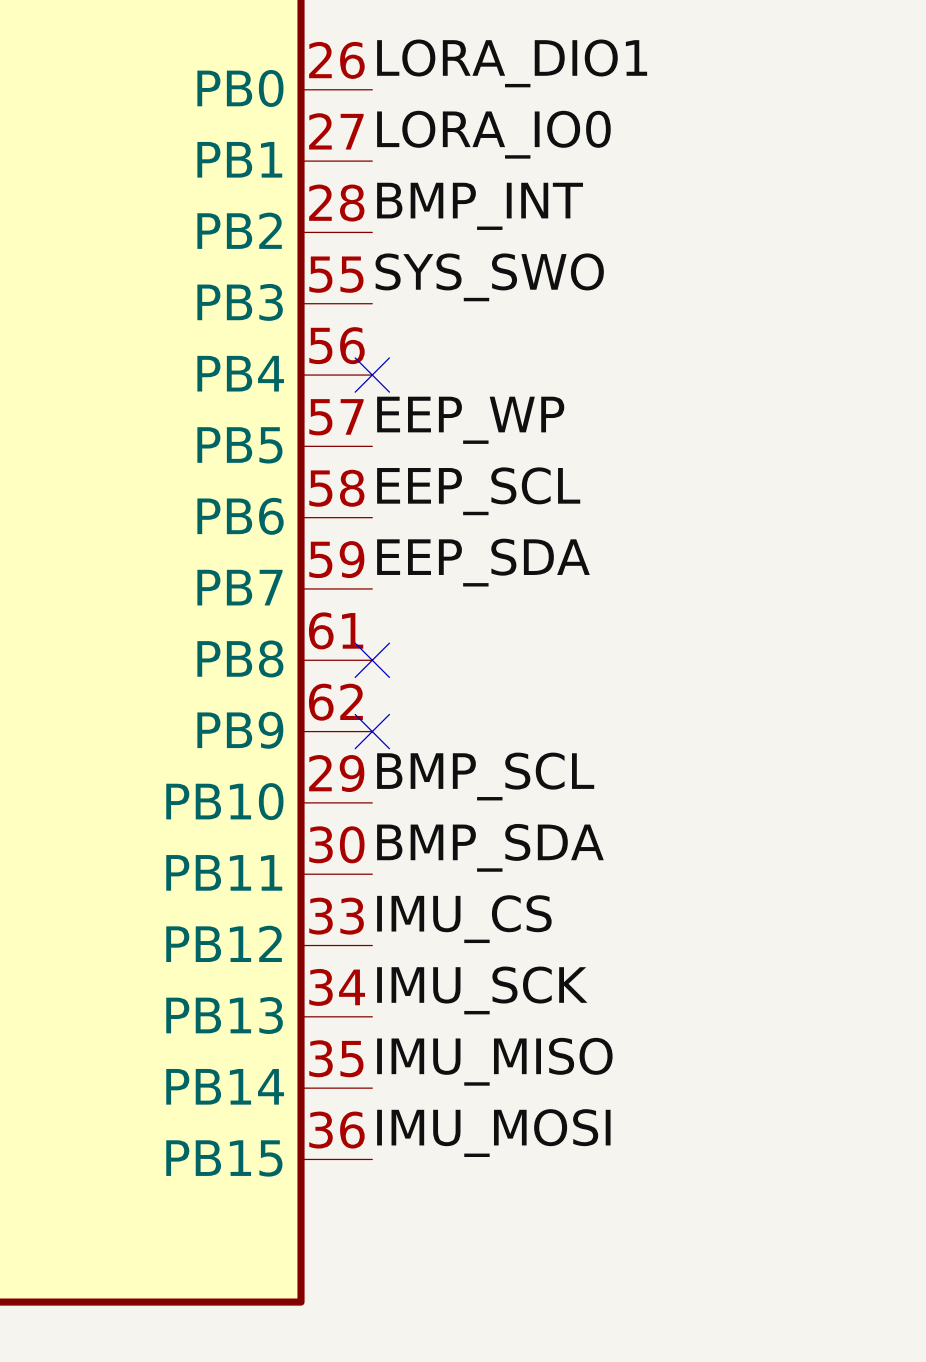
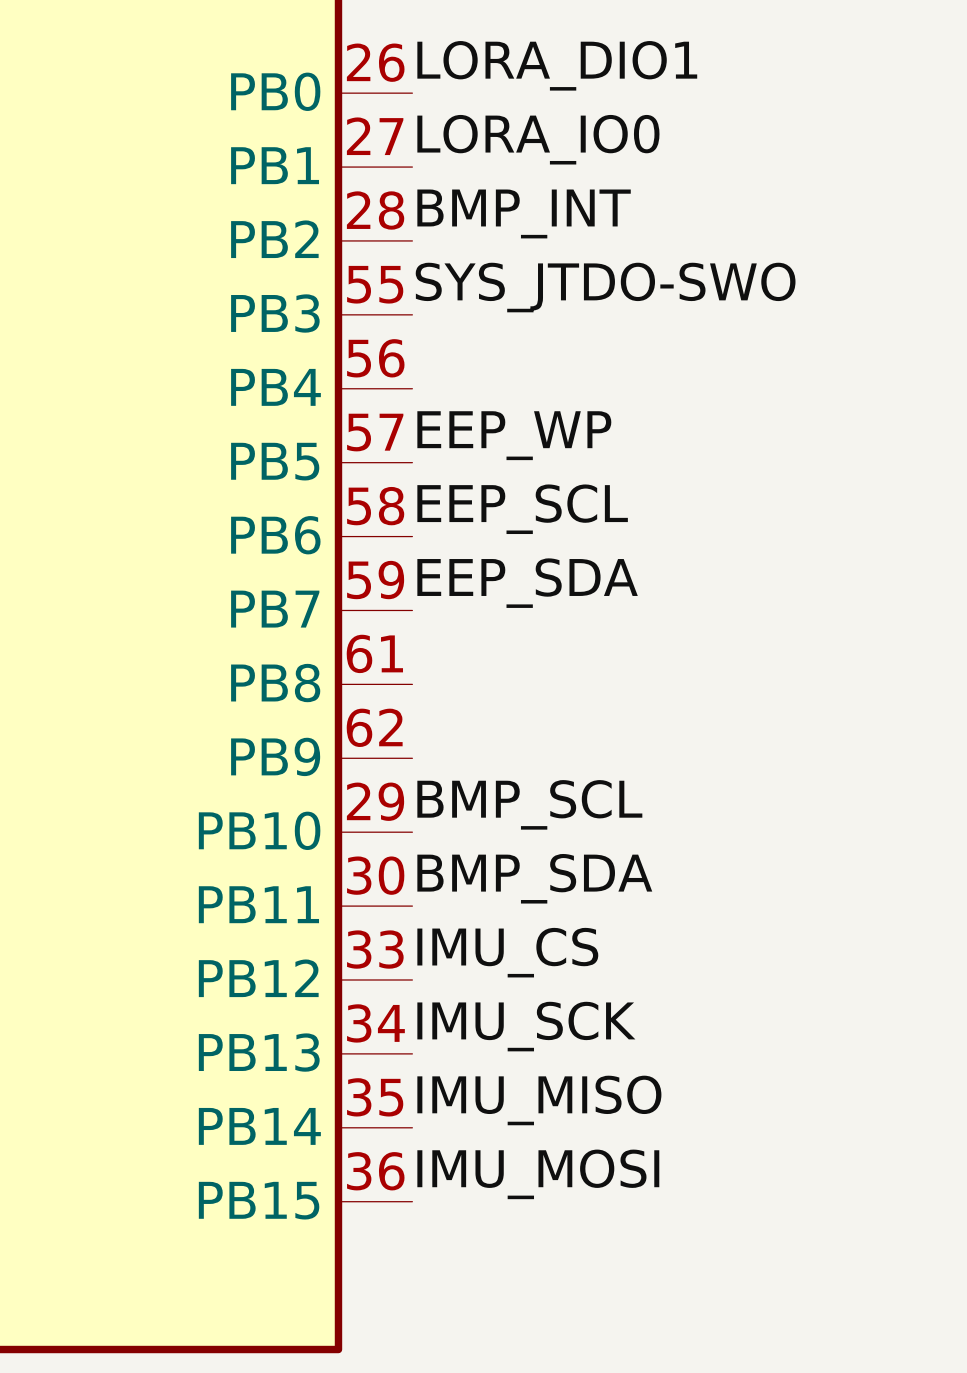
label: SYS_SWO (489, 277) -> SYS_JTDO-SWO (605, 287)
no-connect mark: (372, 375) -> none
no-connect mark: (372, 660) -> none
no-connect mark: (372, 731) -> none

